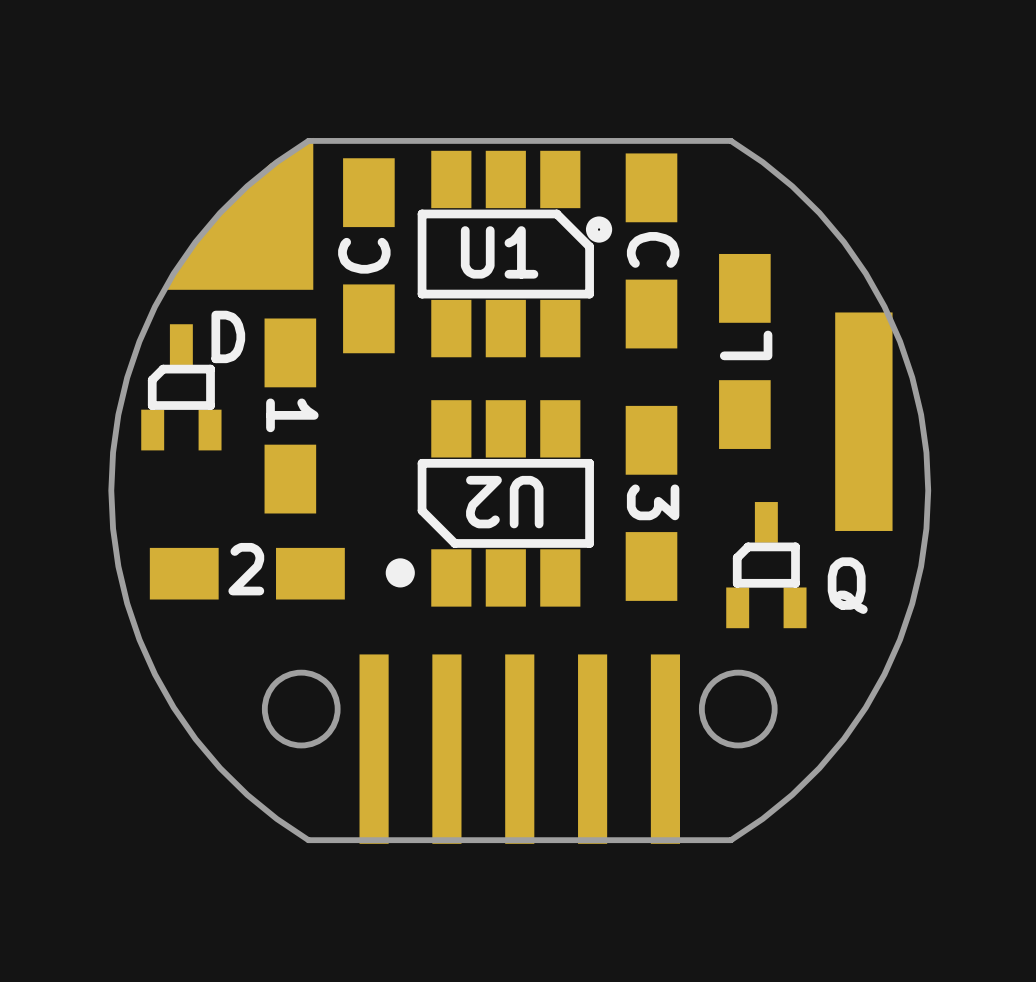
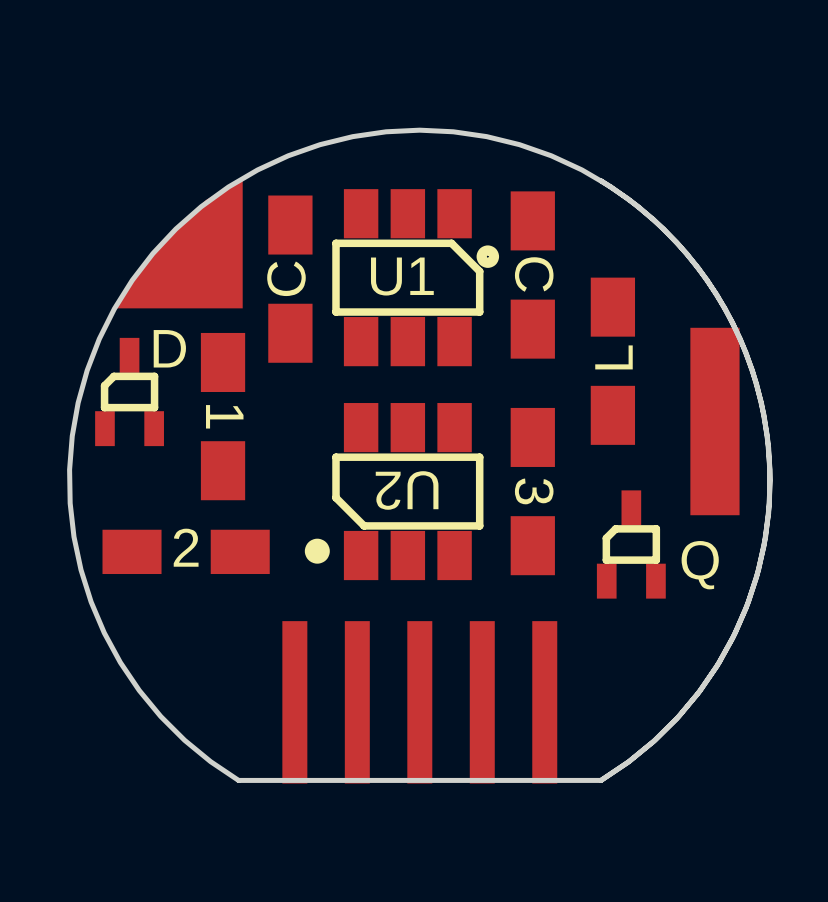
board edge: (308, 140) (730, 140) -> none
board edge: (308, 141) (276, 162) (247, 186) (219, 213) (195, 242) (173, 273) (154, 306) (139, 341) (127, 377) (118, 414) (113, 452) (111, 490) (113, 528) (118, 566) (127, 603) (139, 639) (155, 674) (173, 707) (195, 738) (220, 768) (247, 794) (276, 818) (308, 840) -> (601, 780) (629, 761) (655, 740) (678, 716) (700, 690) (719, 662) (735, 632) (748, 601) (758, 569) (765, 536) (769, 503) (770, 469) (767, 435) (761, 402) (752, 370) (740, 338) (725, 308) (707, 280) (686, 253) (663, 228) (638, 206) (610, 186) (581, 169) (551, 155) (519, 144) (486, 136) (453, 131) (419, 130) (386, 131) (352, 136) (320, 144) (288, 155) (257, 169) (228, 186) (201, 206) (175, 228) (152, 253) (132, 280) (114, 308) (99, 338) (87, 370) (78, 402) (72, 436) (69, 469) (70, 503) (73, 536) (80, 569) (91, 601) (104, 632) (120, 662) (139, 690) (160, 716) (184, 740) (210, 761) (238, 780)
round board edge: [261, 669, 341, 749] -> none
round board edge: [698, 669, 778, 749] -> none

